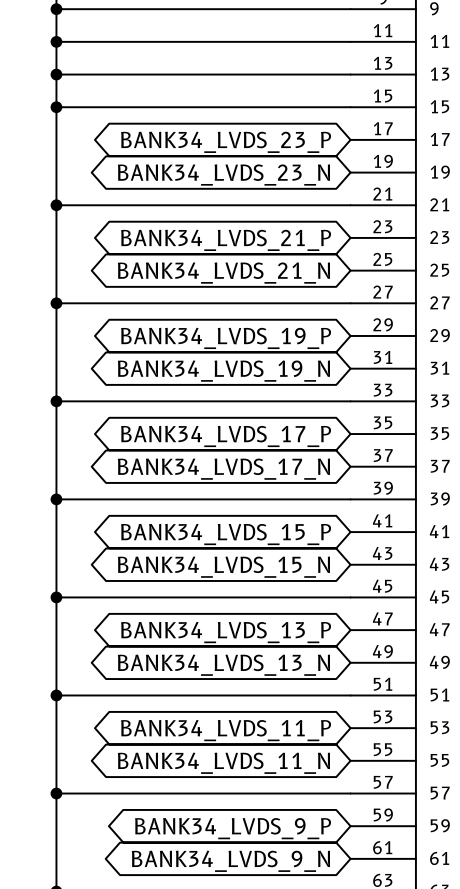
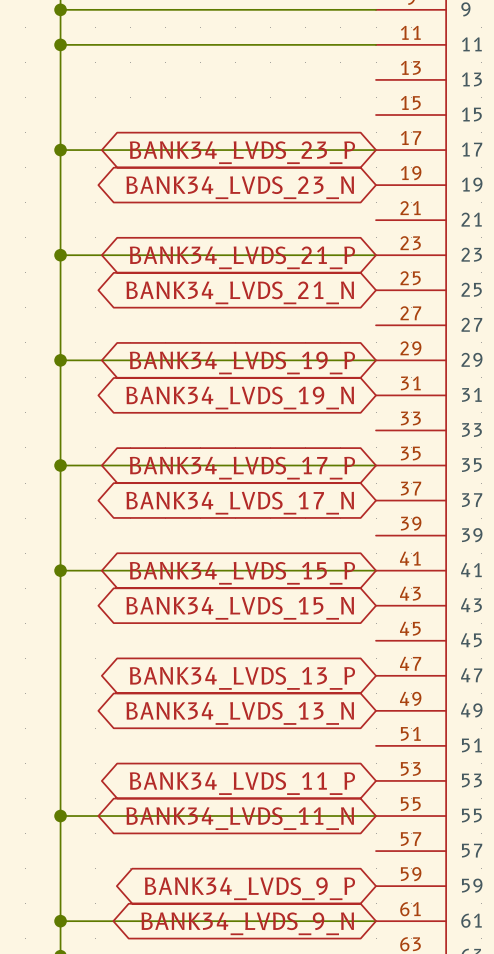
wire: (56, 74) (350, 74) -> none
junction: (56, 74) -> none
wire: (56, 107) (350, 107) -> (60, 150) (376, 150)
junction: (56, 107) -> none
junction: none -> (60, 150)
wire: (56, 205) (350, 205) -> (60, 255) (376, 255)
junction: (56, 205) -> none
junction: none -> (60, 255)
wire: (56, 303) (350, 303) -> (60, 360) (376, 360)
junction: (56, 303) -> none
junction: none -> (60, 360)
wire: (56, 401) (350, 401) -> (60, 465) (376, 465)
junction: (56, 401) -> none
junction: none -> (60, 465)
wire: (56, 499) (350, 499) -> (60, 570) (376, 570)
junction: (56, 499) -> none
junction: none -> (60, 570)
wire: (56, 597) (350, 597) -> none
junction: (56, 597) -> none
wire: (56, 695) (350, 695) -> (60, 816) (376, 816)
junction: (56, 695) -> none
junction: none -> (60, 816)
wire: (56, 793) (350, 793) -> (60, 921) (376, 921)
junction: (56, 793) -> none
junction: none -> (60, 921)

